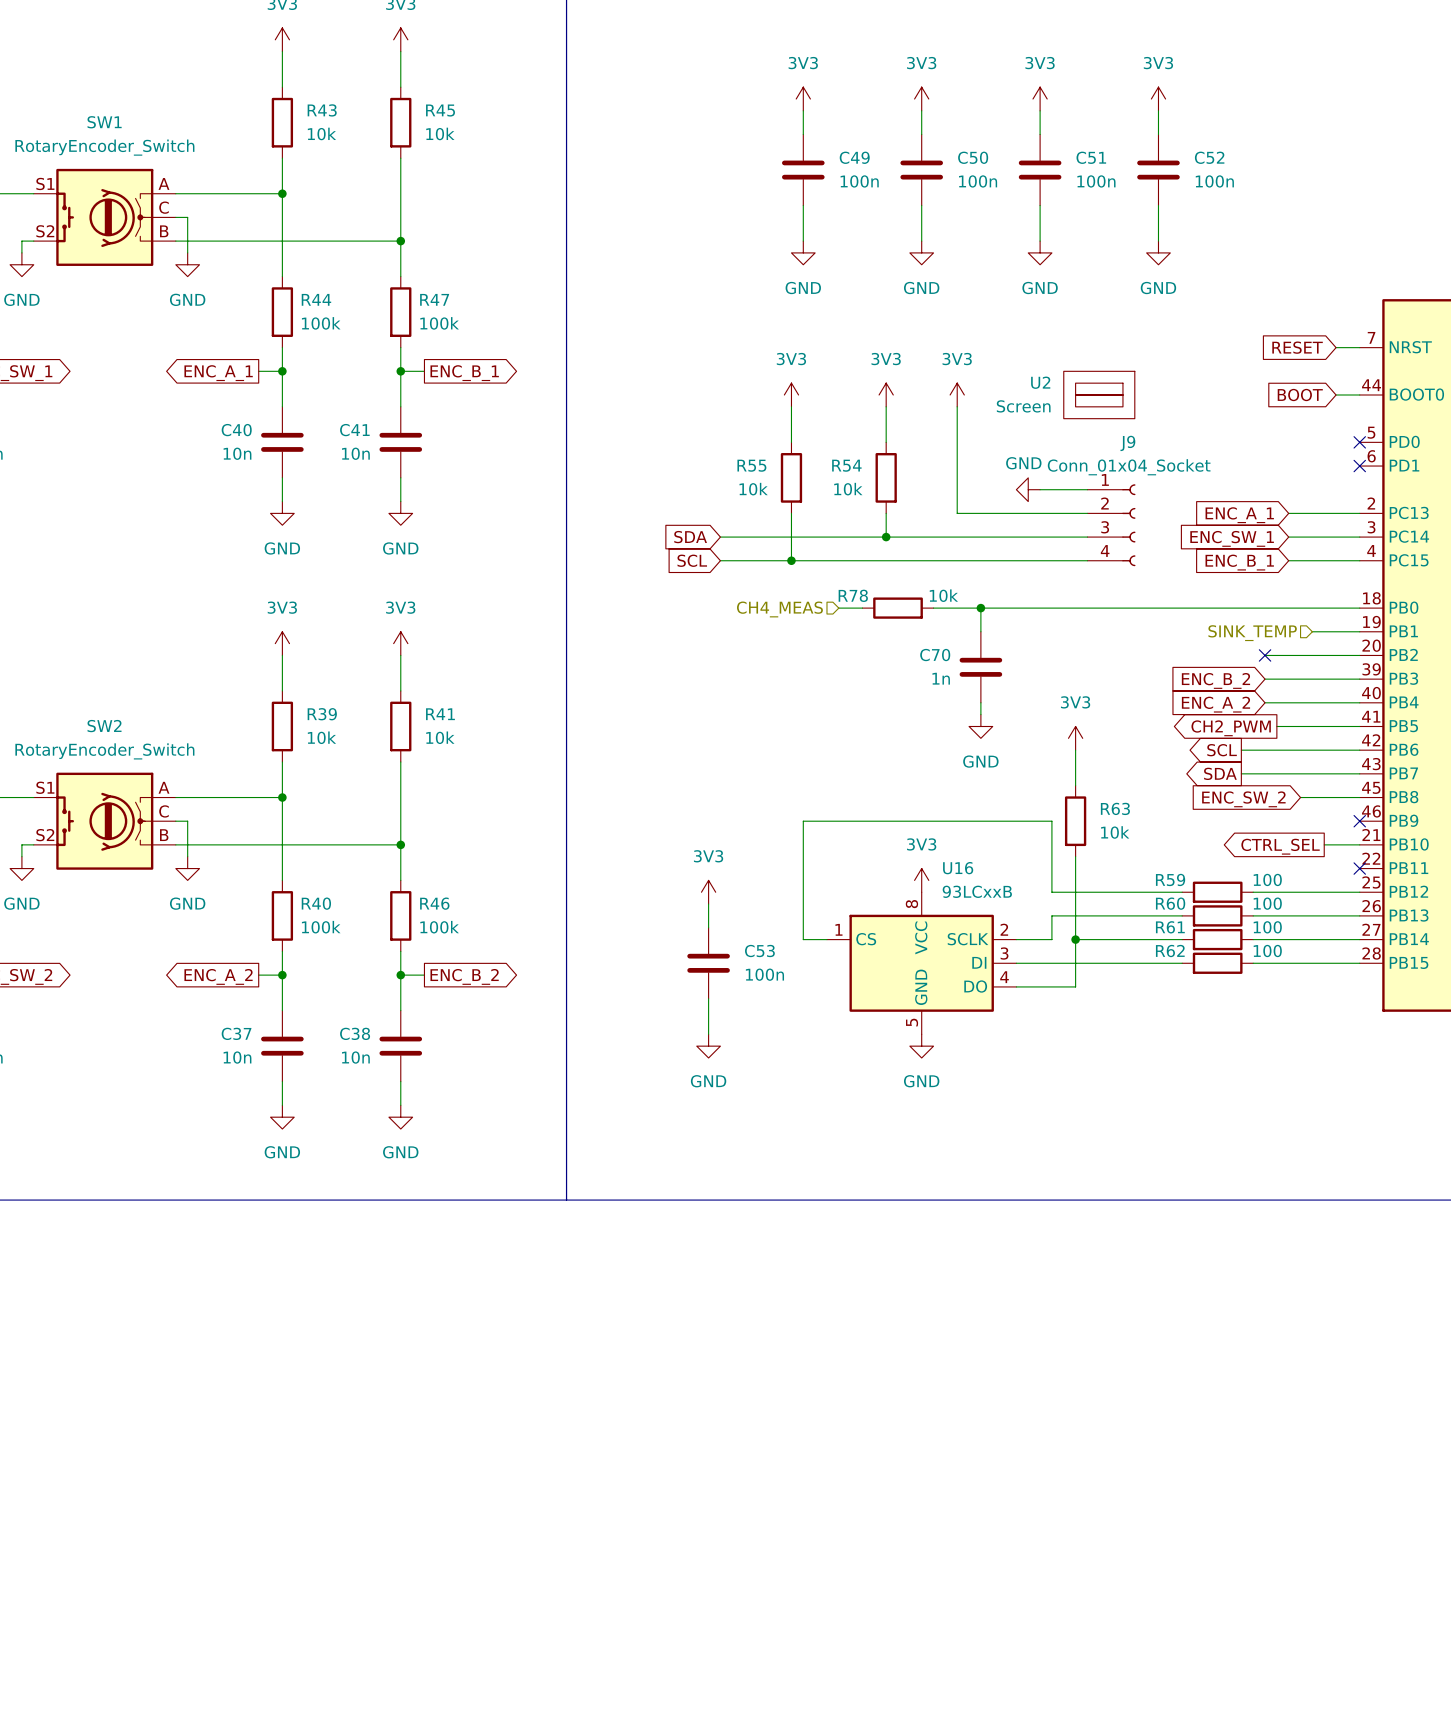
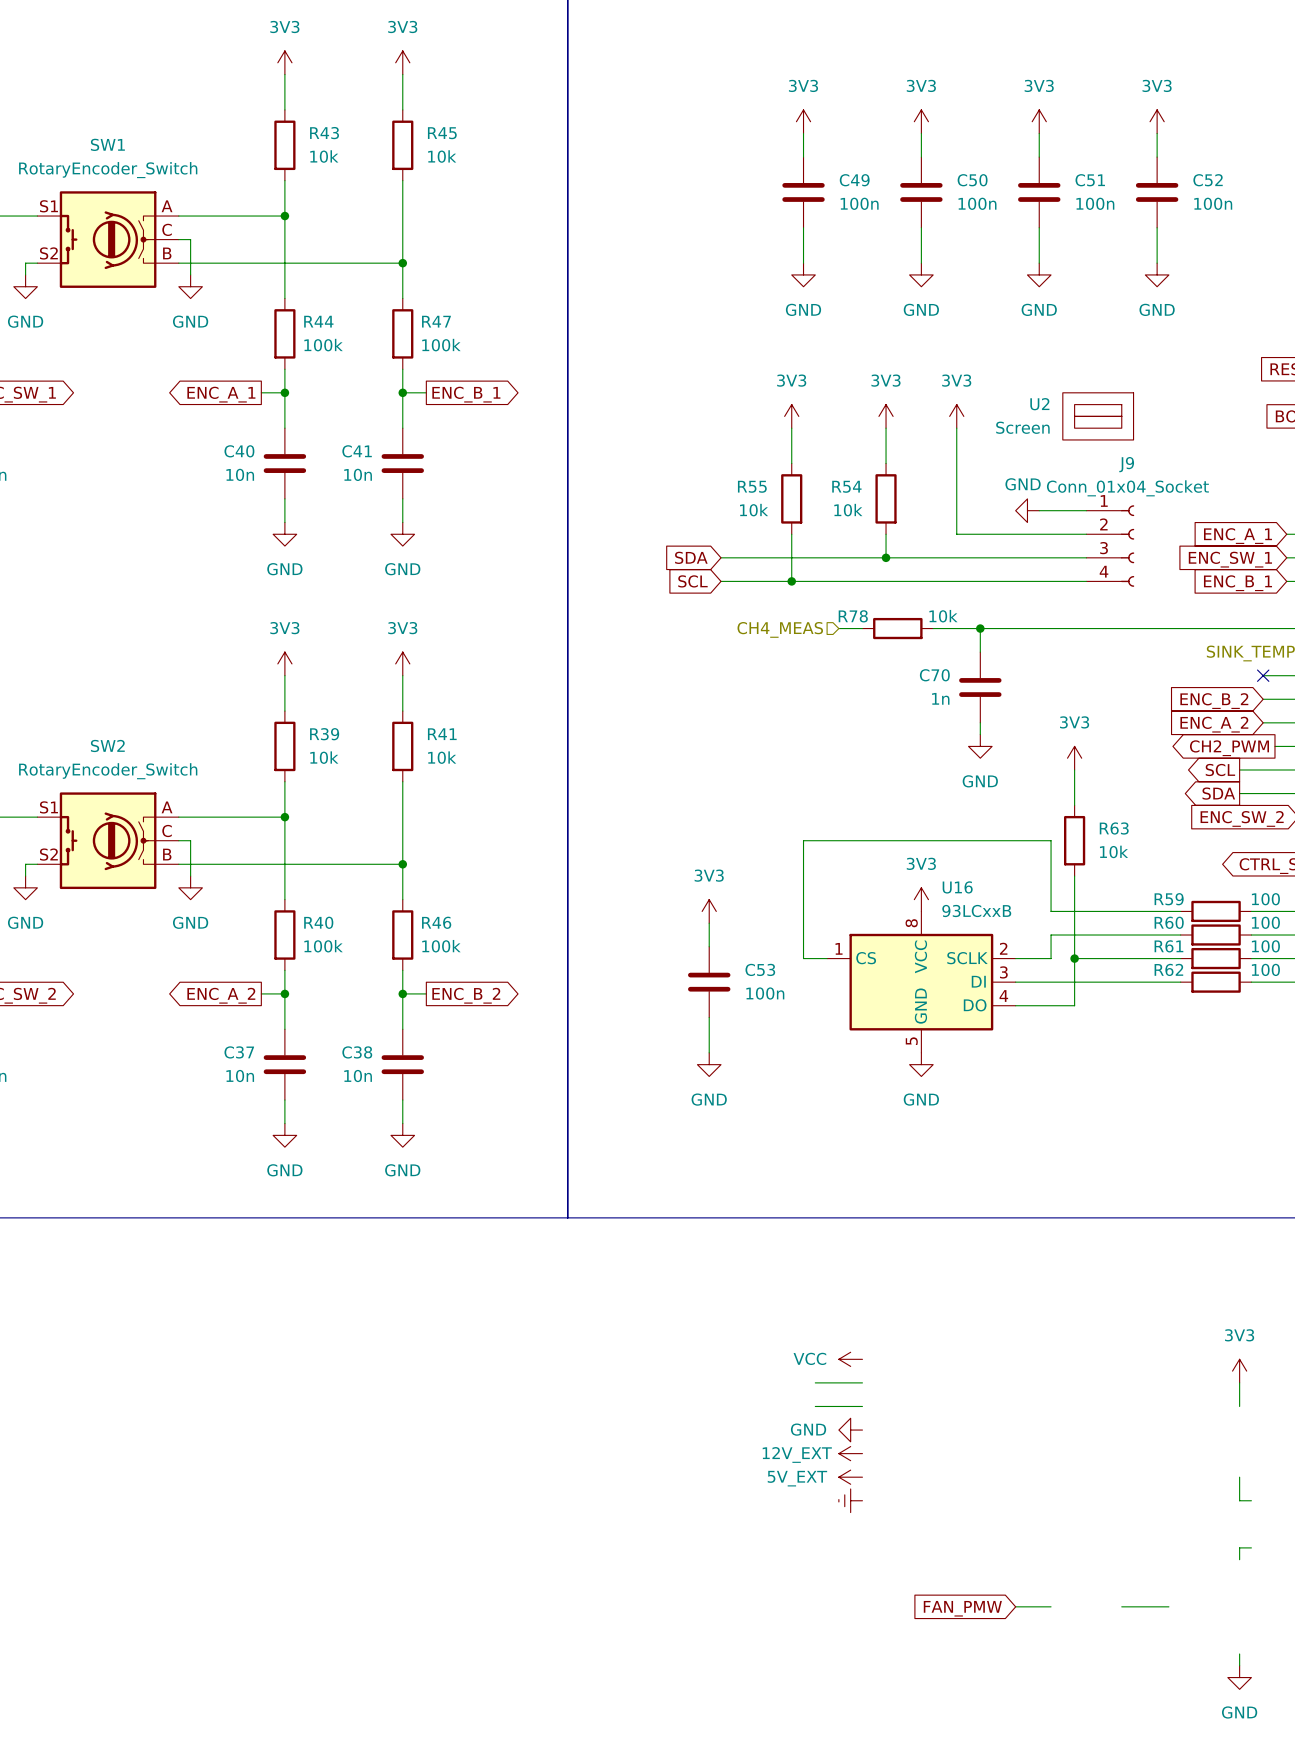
power symbol: none -> VCC (850, 1359)
power symbol: none -> 3V3 (1239, 1371)
wire: none -> (815, 1382) (862, 1382)
wire: none -> (1239, 1382) (1239, 1406)
wire: none -> (815, 1406) (862, 1406)
power symbol: none -> GND (850, 1430)
power symbol: none -> 12V_EXT (850, 1453)
power symbol: none -> 5V_EXT (850, 1477)
wire: none -> (1239, 1477) (1239, 1500) (1251, 1500)
power symbol: none -> (850, 1500)
wire: none -> (1251, 1547) (1239, 1547) (1239, 1559)
wire: none -> (1015, 1606) (1051, 1606)
wire: none -> (1121, 1606) (1168, 1606)
global label: none -> FAN_PMW (962, 1608)
wire: none -> (1239, 1653) (1239, 1665)
power symbol: none -> GND (1239, 1677)

